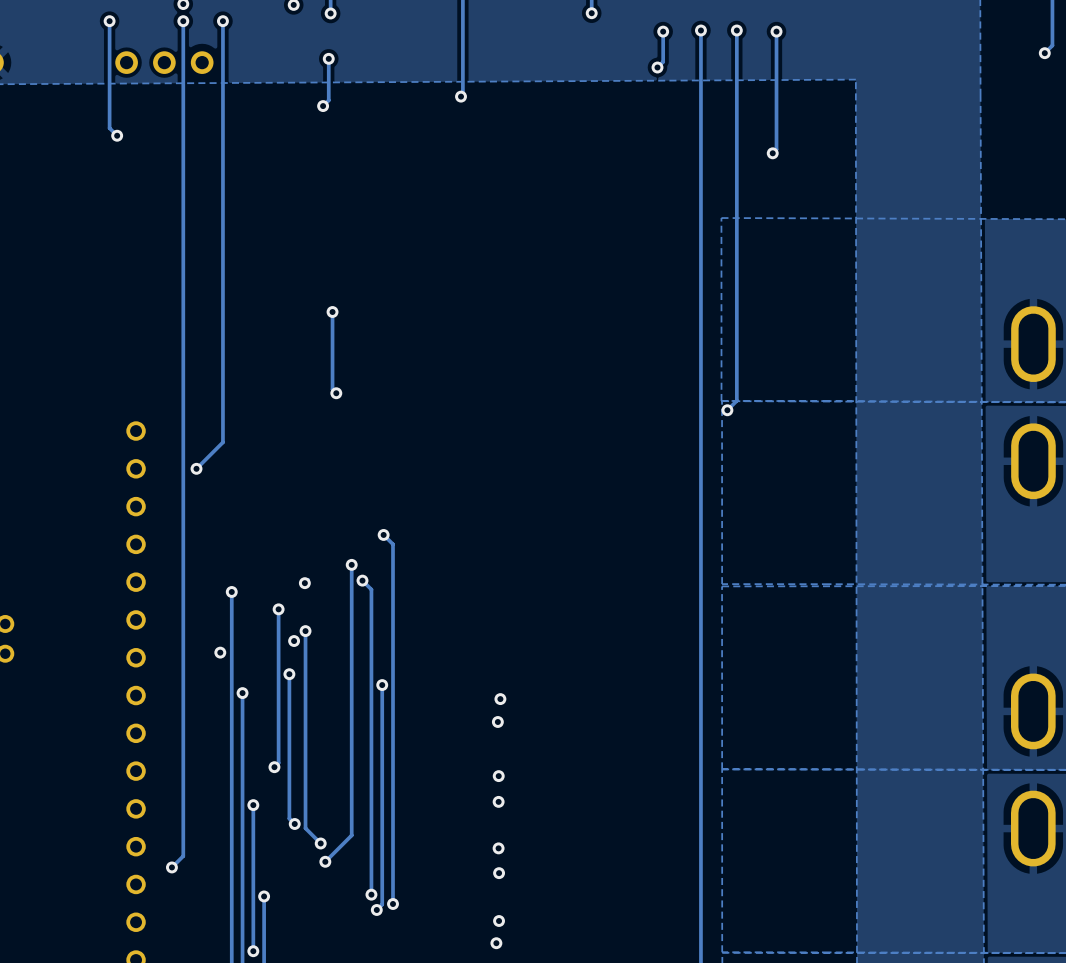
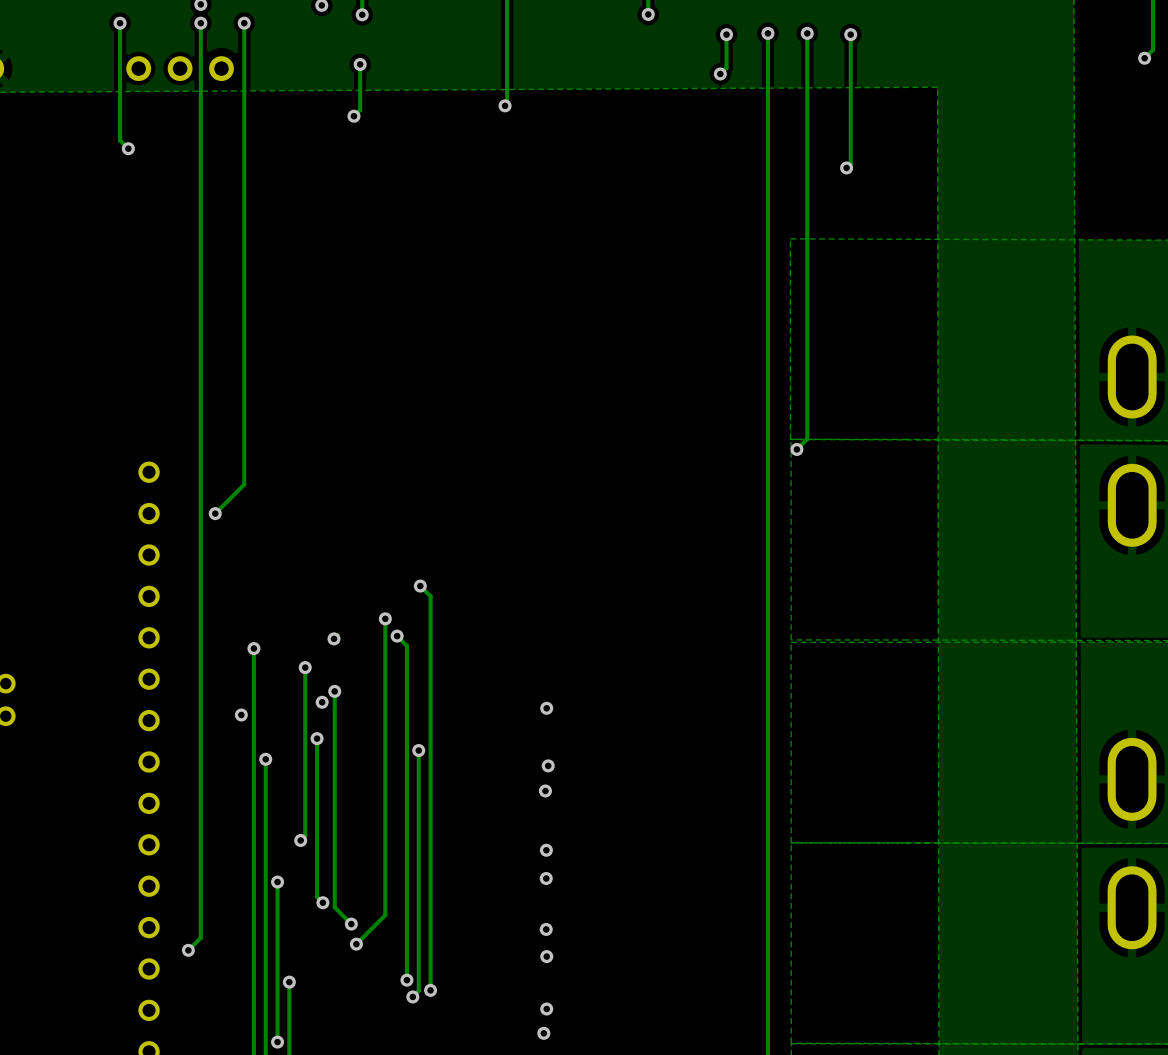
track: (332, 312) (332, 389) (336, 393) -> none
via: (332, 312) -> none
via: (336, 393) -> none
via: none -> (546, 708)

